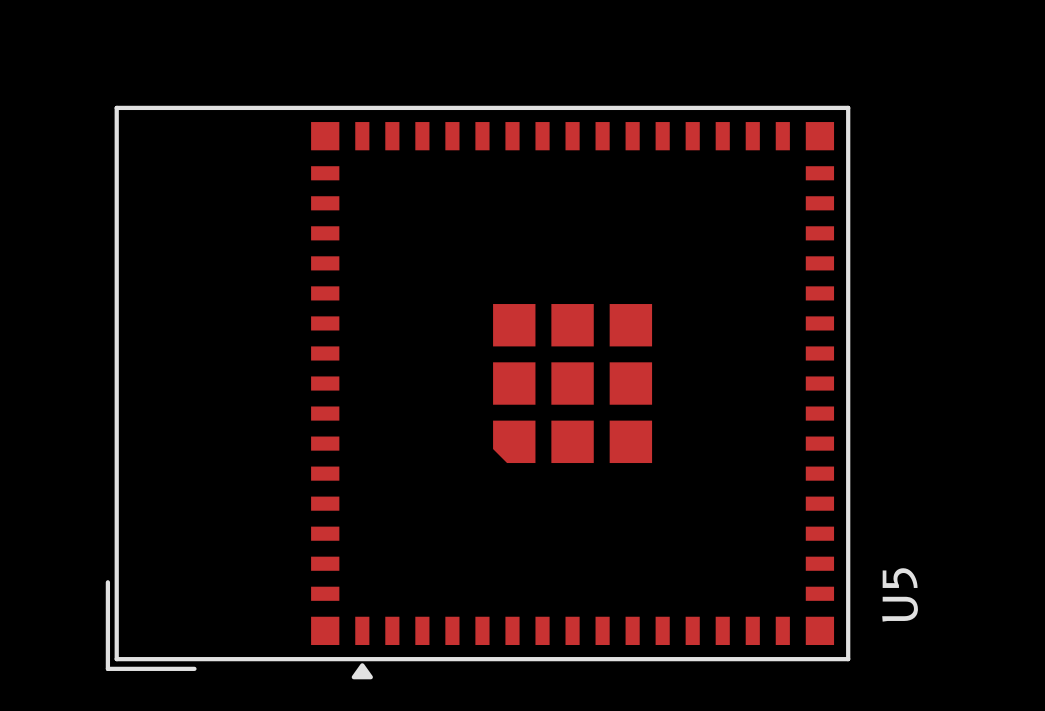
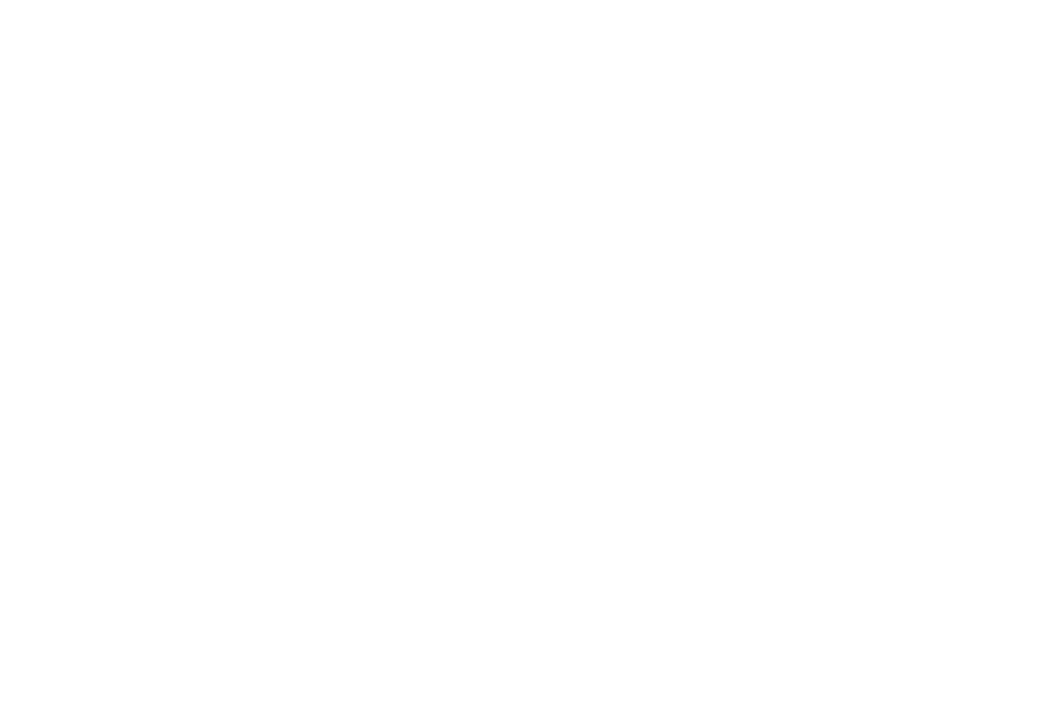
U5: (478, 392) -> none

